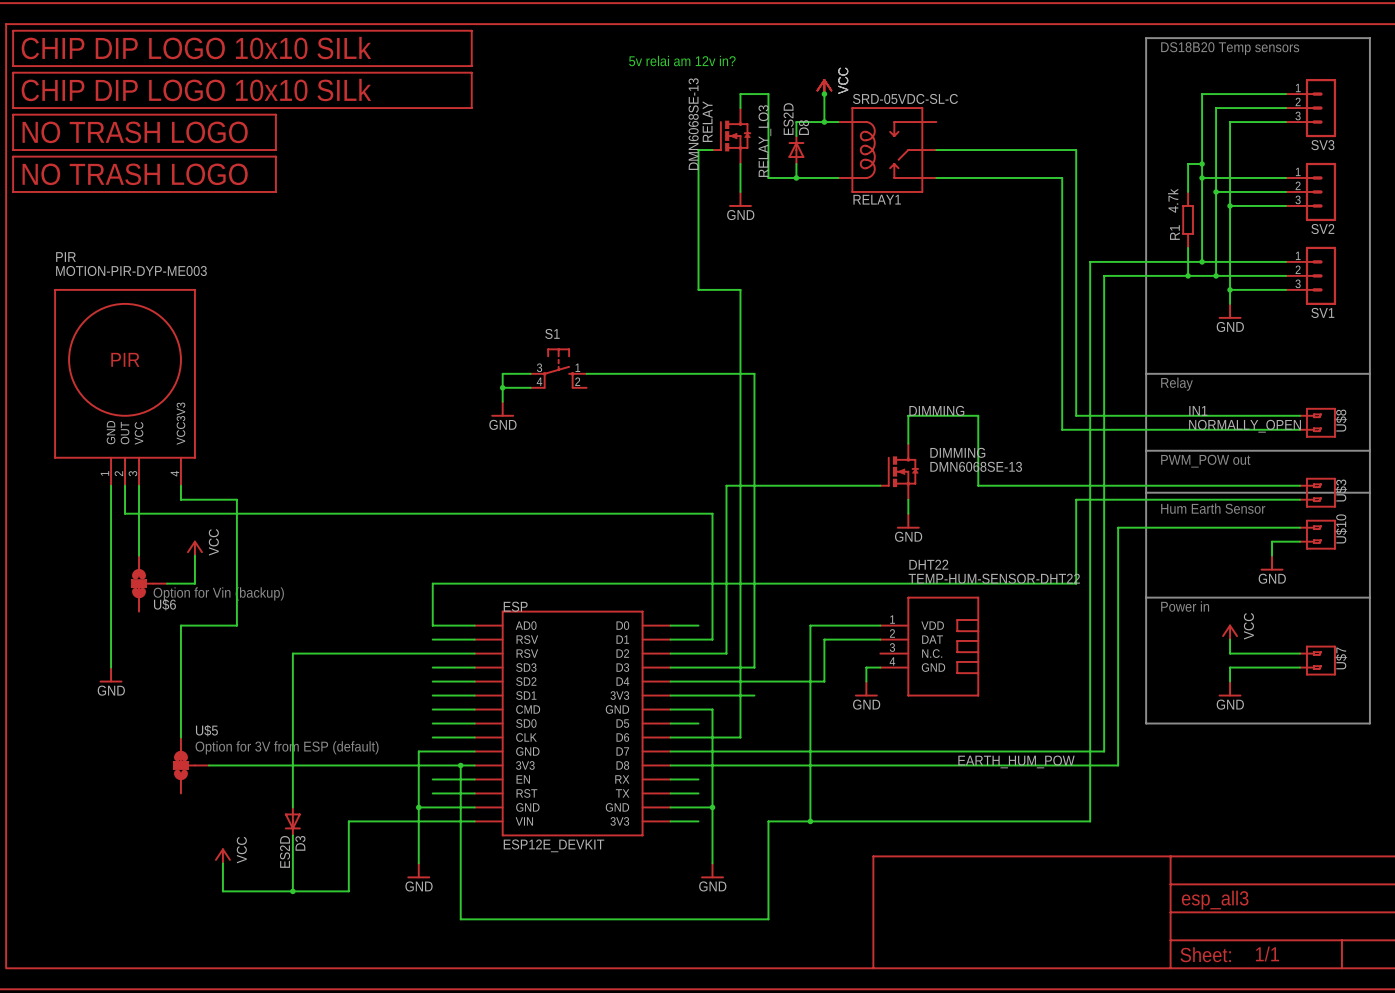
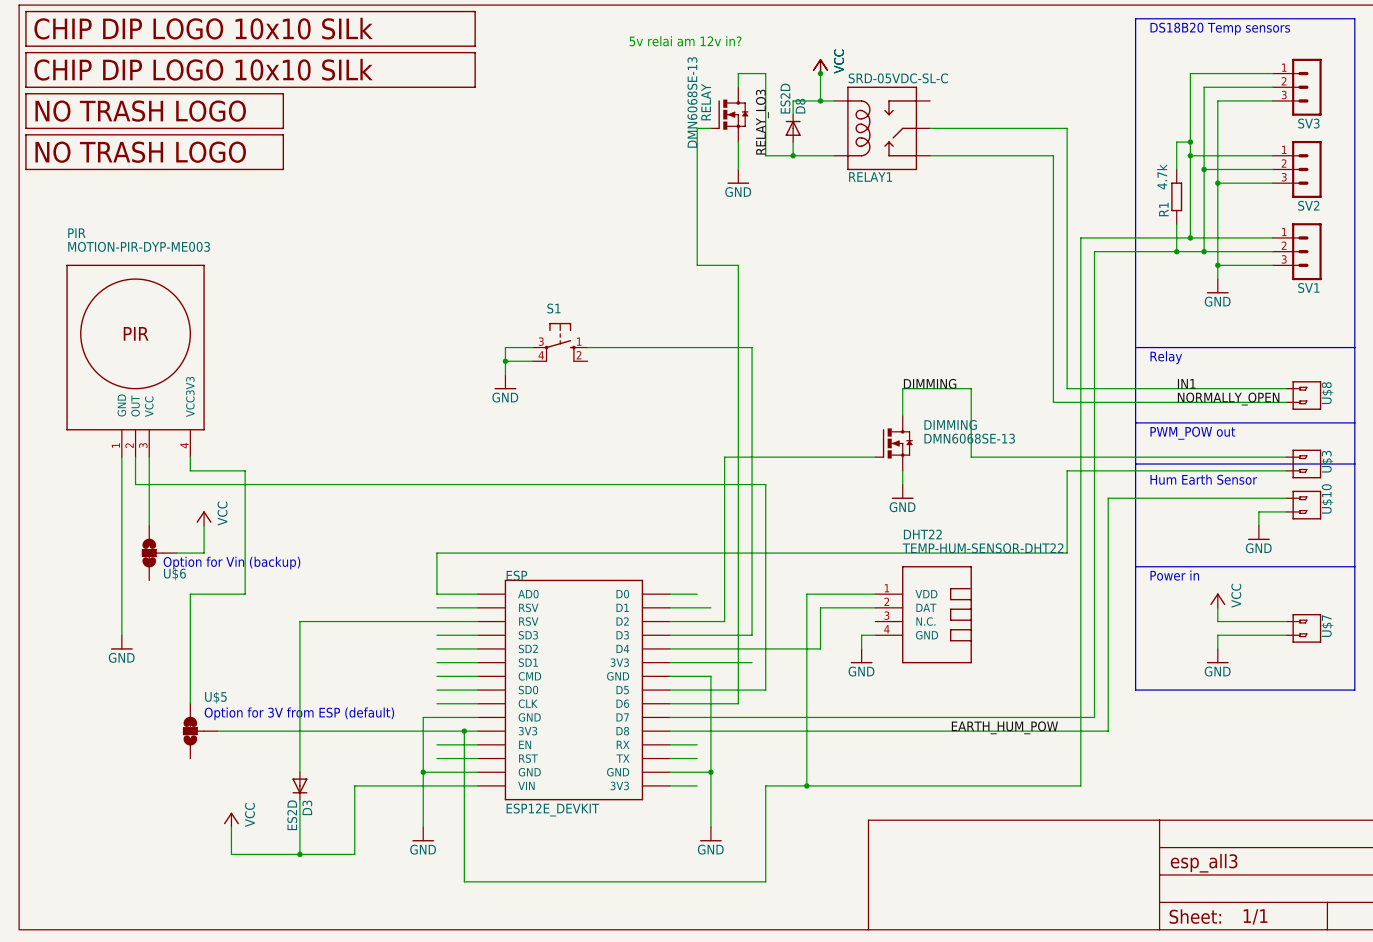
wire: (712, 513) (712, 639) -> (710, 484) (765, 484) (765, 690) (697, 690)

